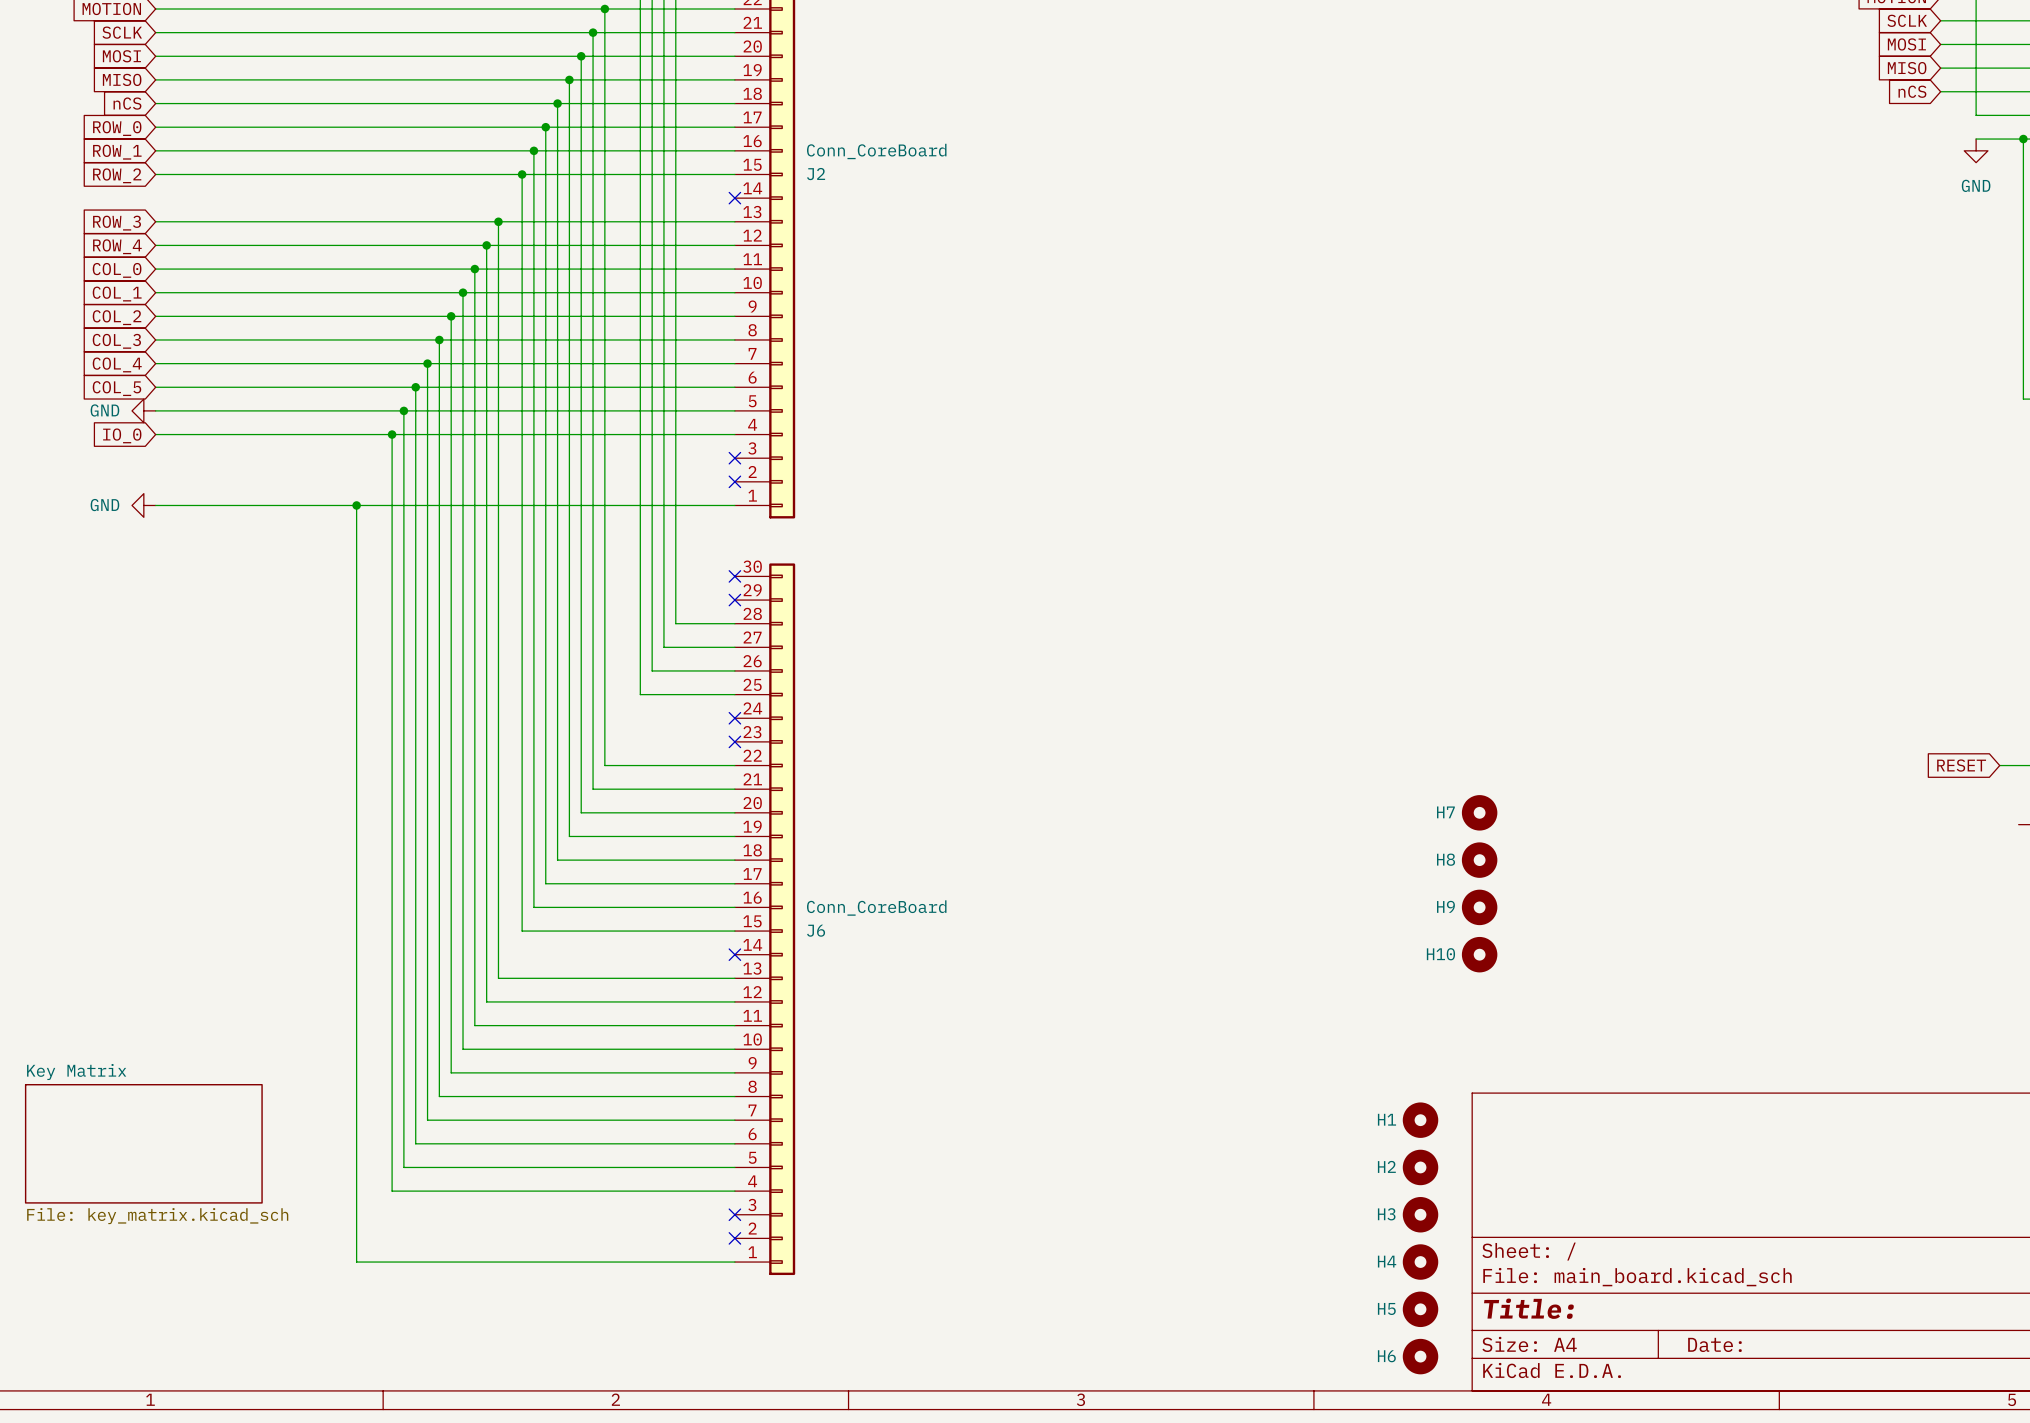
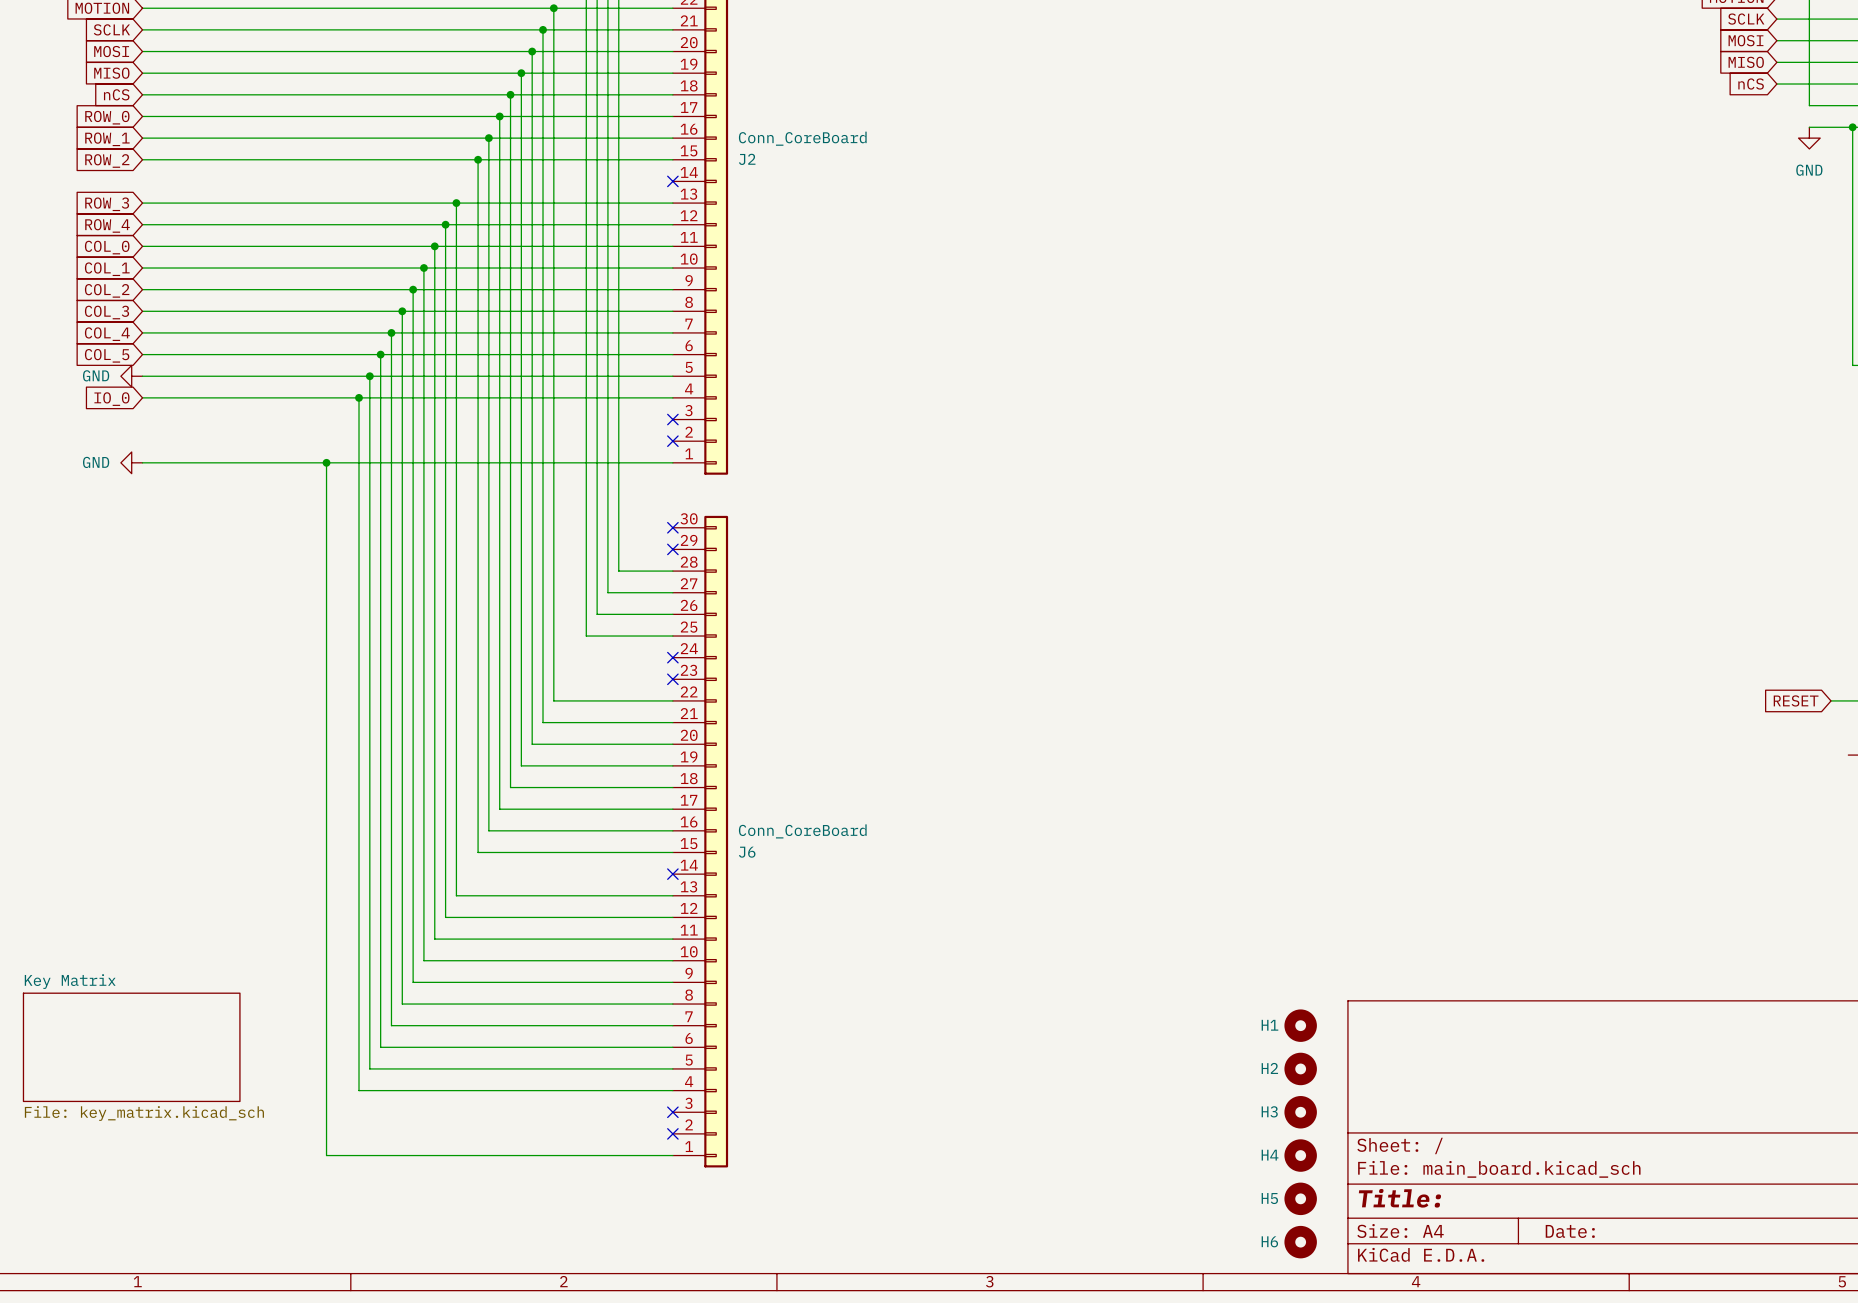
H7: (1479, 812) -> none
H8: (1479, 860) -> none
H9: (1479, 907) -> none
H10: (1479, 954) -> none

